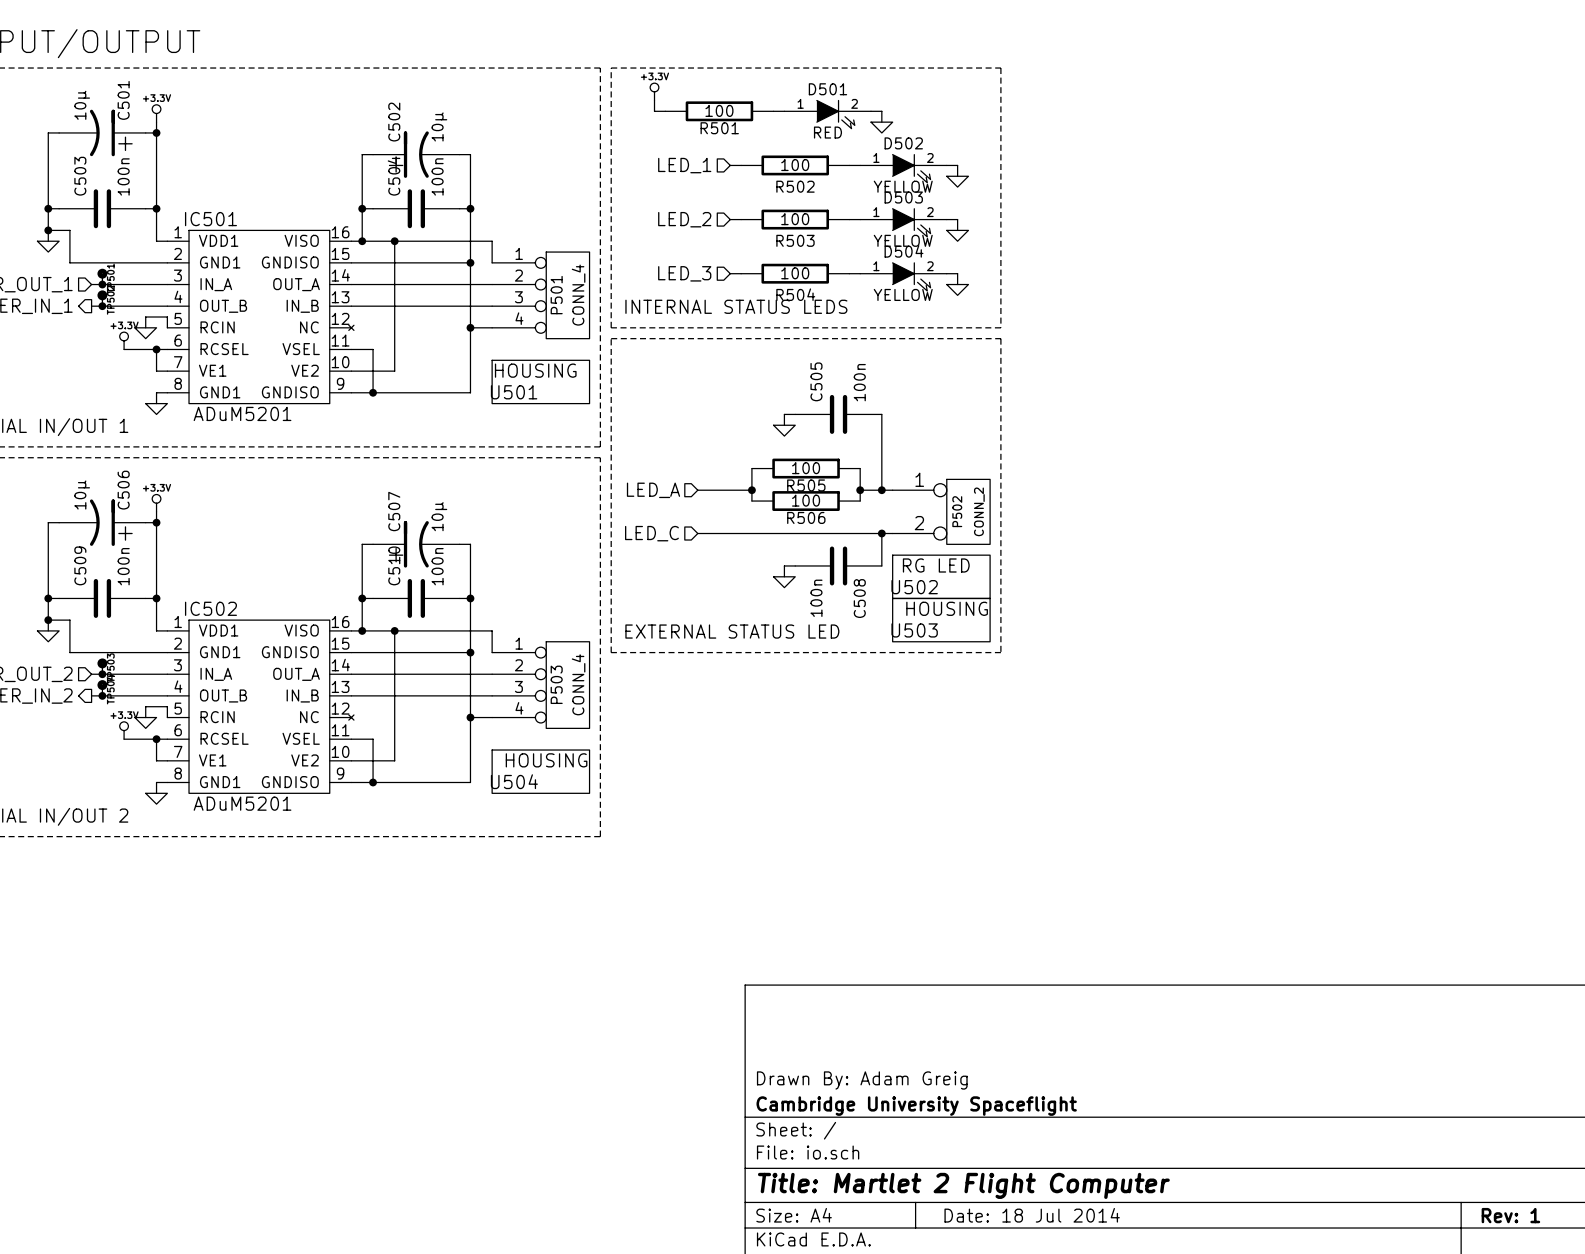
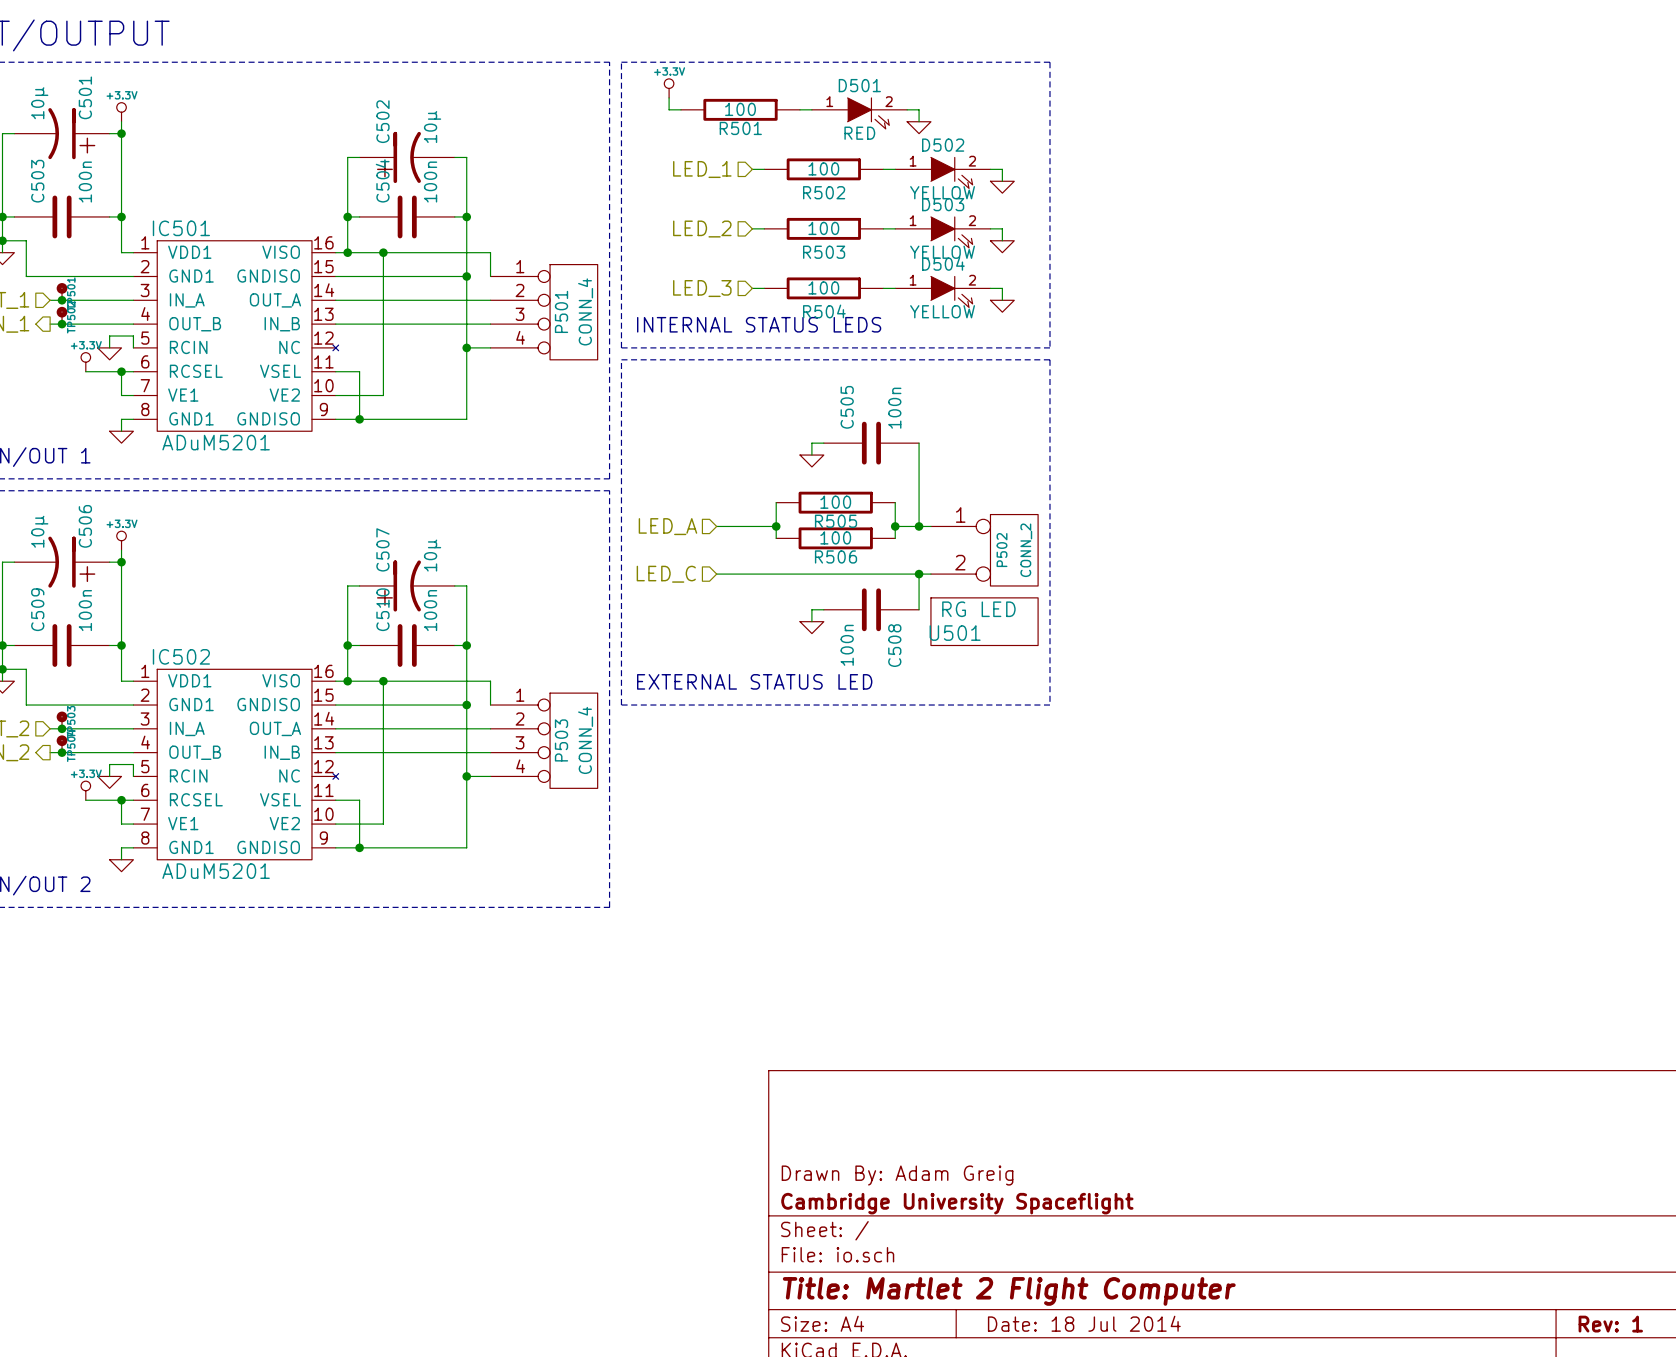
U501: HOUSING (540, 381) -> none
U502 name: U502 (914, 587) -> U501 (955, 633)
U503: HOUSING (941, 620) -> none
U504: HOUSING (540, 771) -> none

